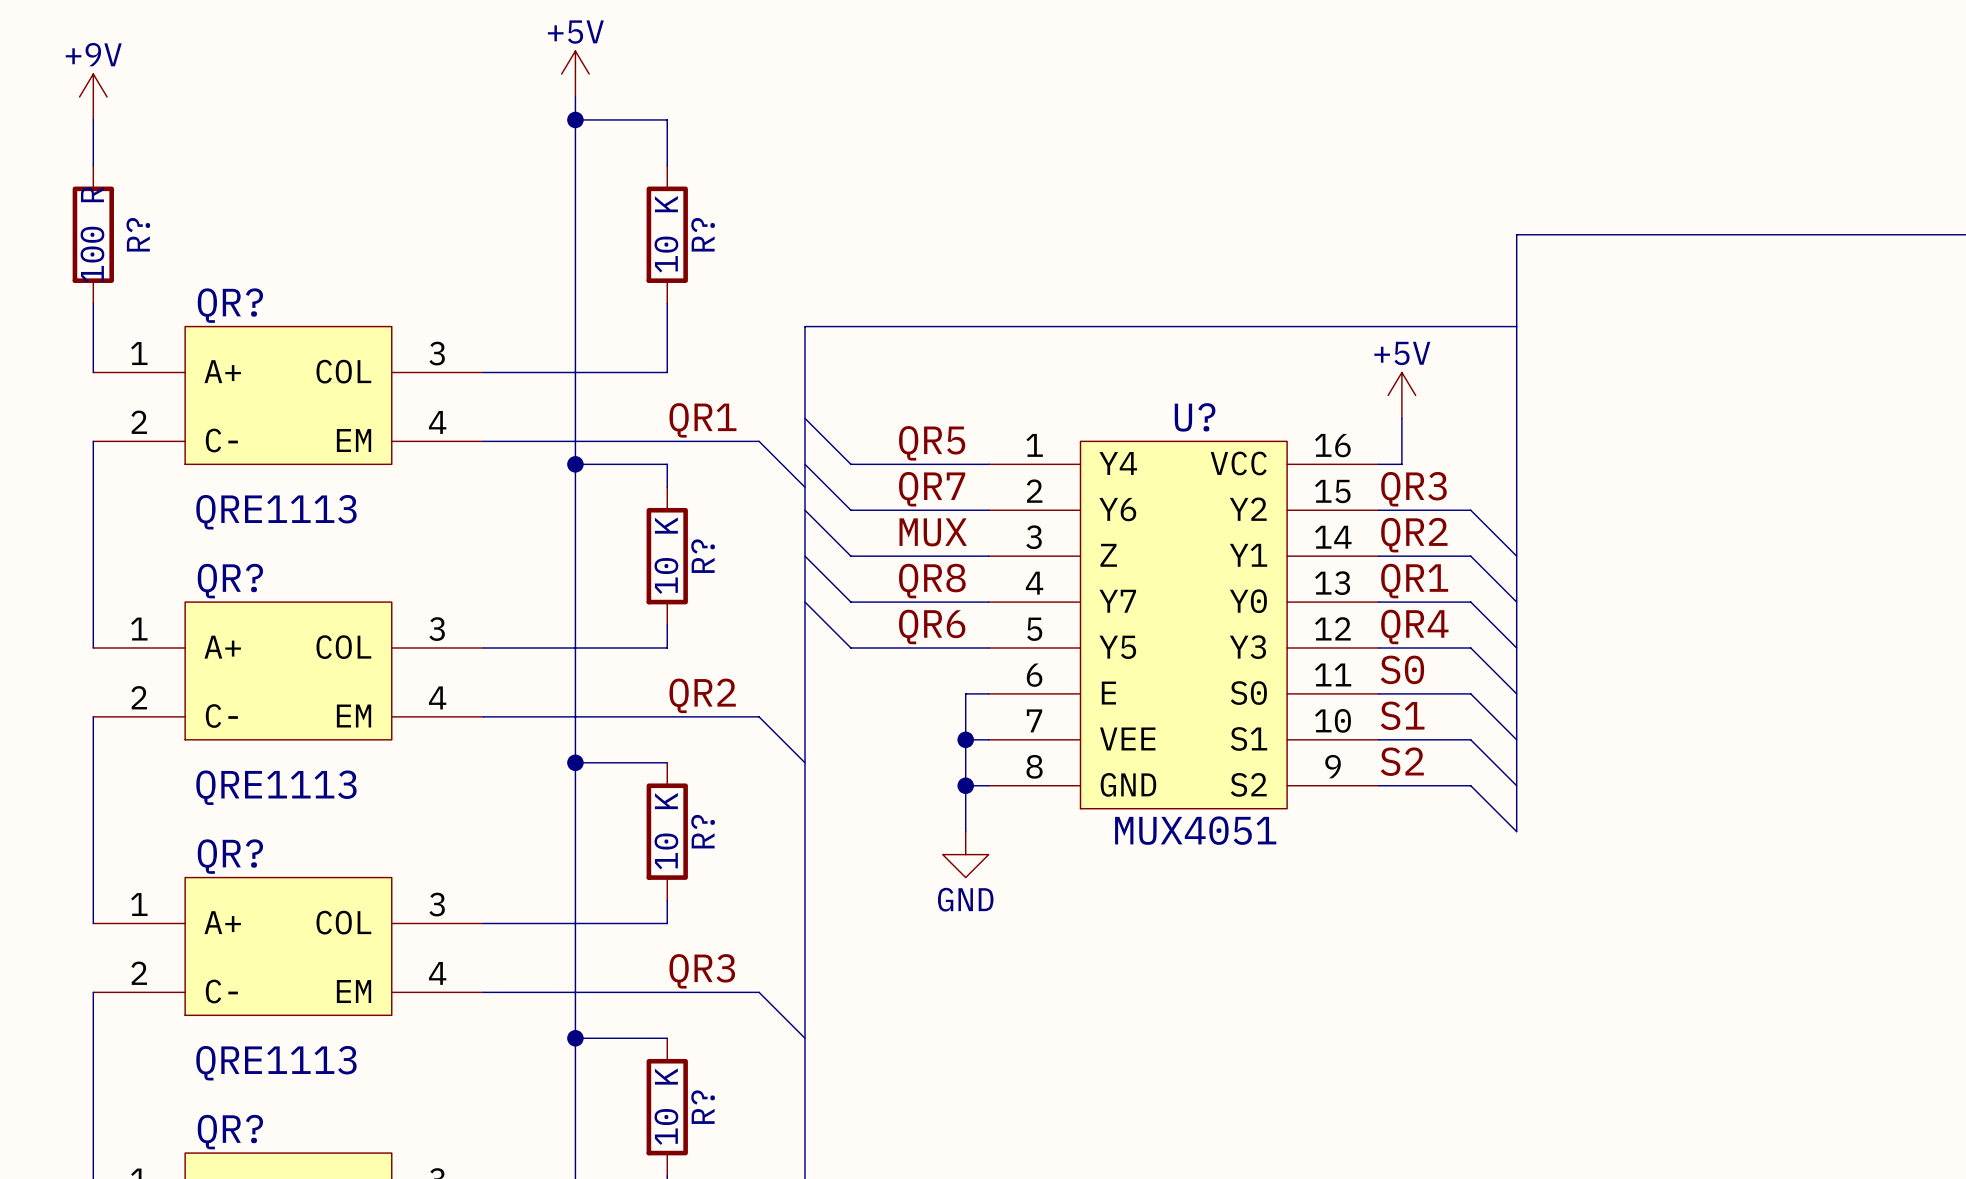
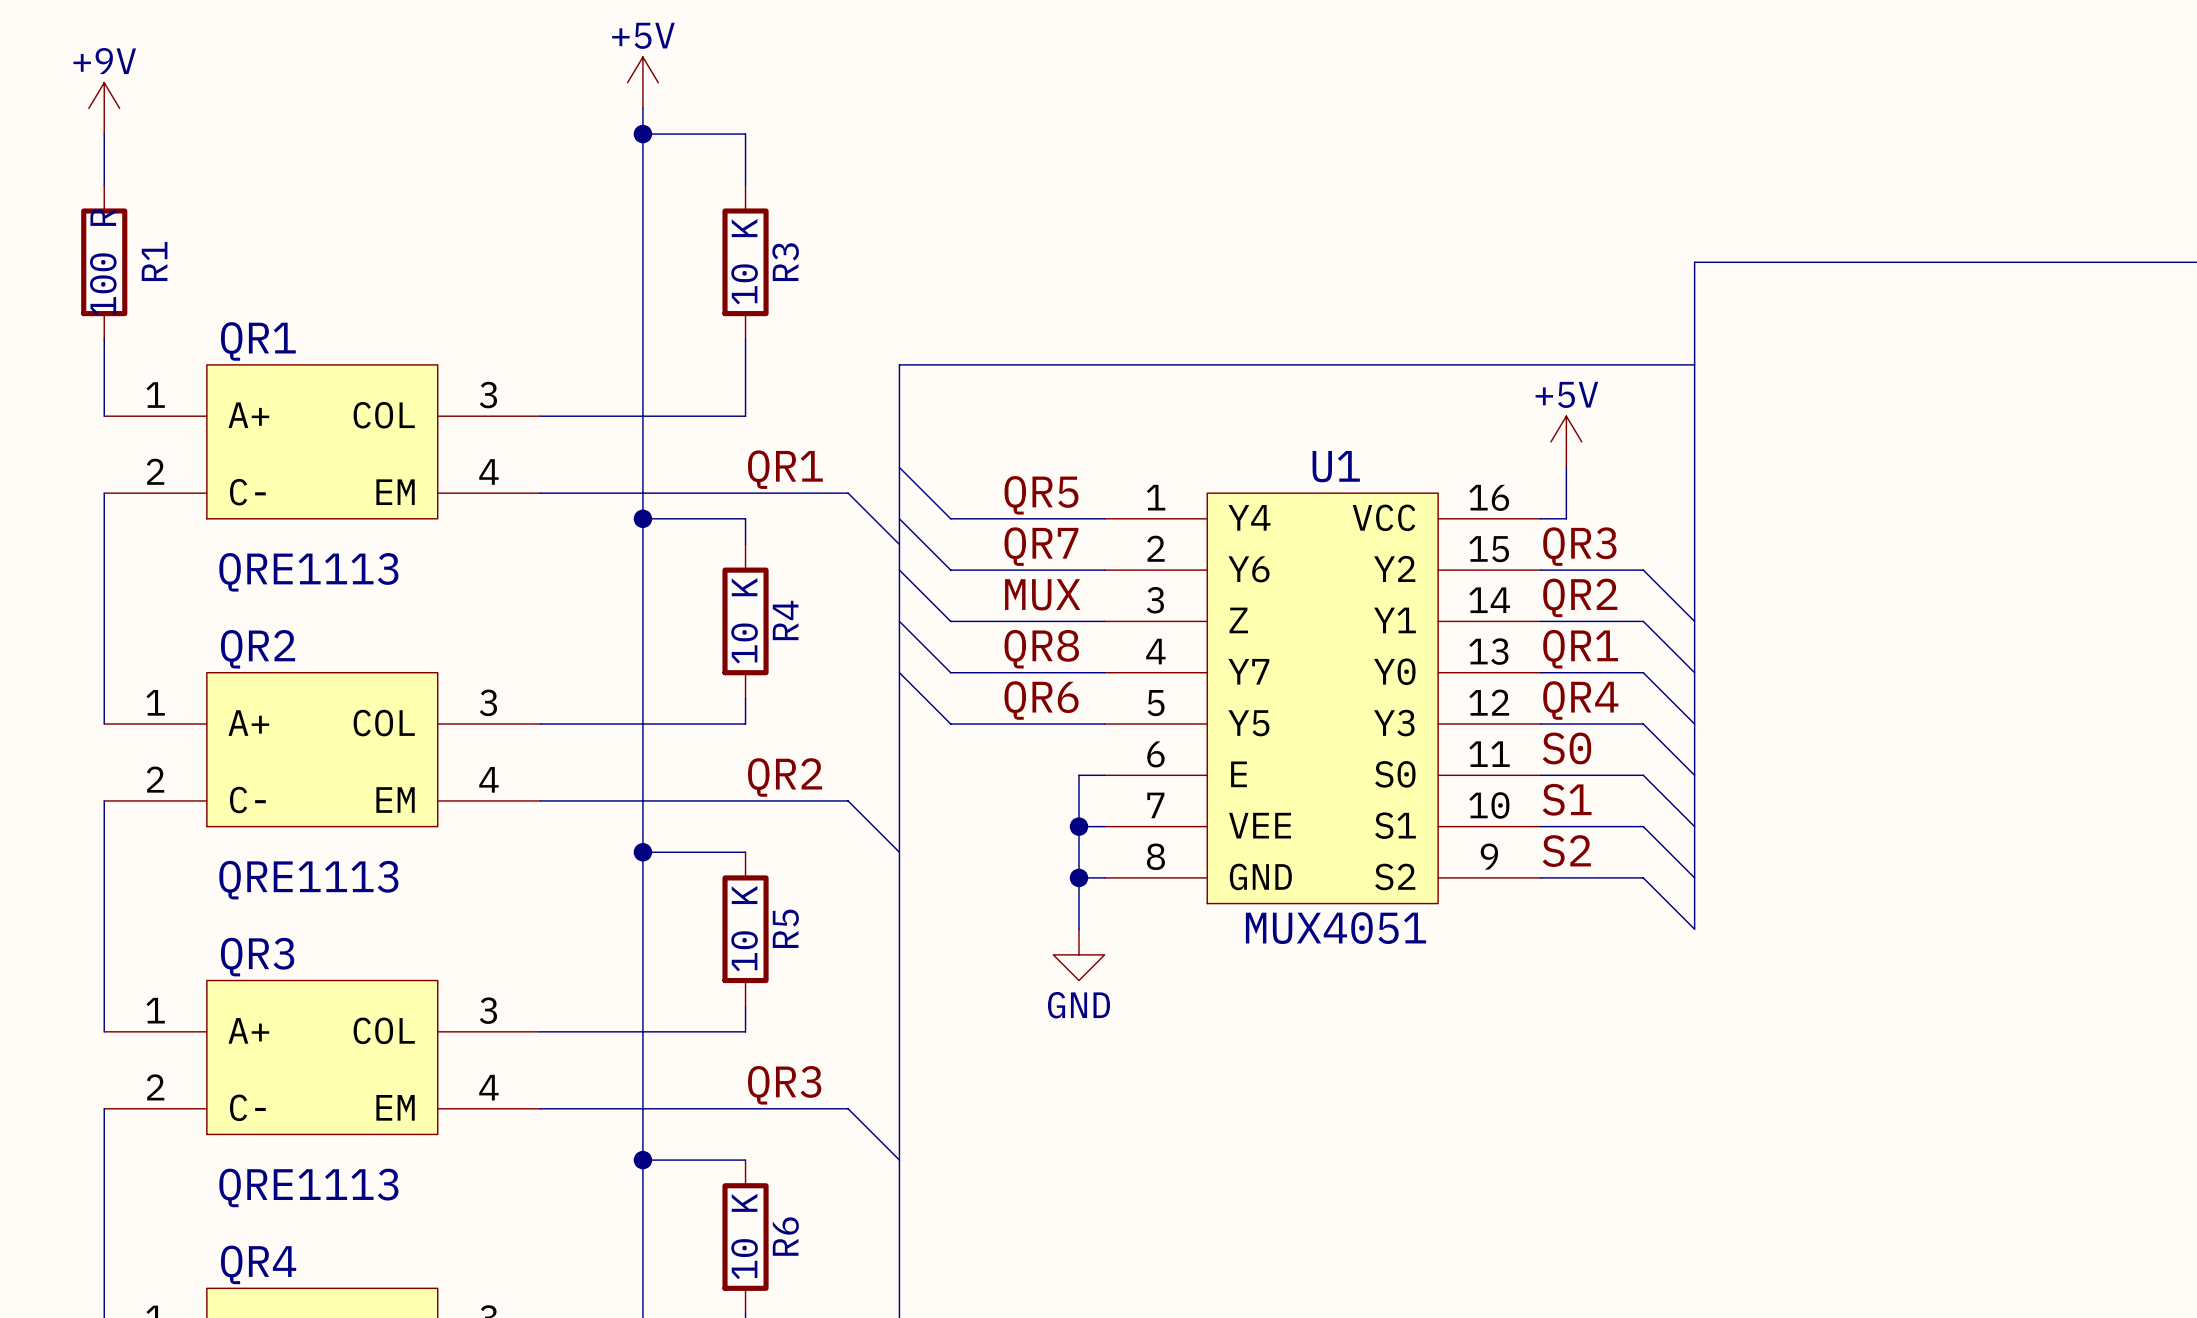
R? name: R? (138, 234) -> R1 (154, 261)
R? name: R? (703, 234) -> R3 (785, 262)
QR? name: QR? (230, 305) -> QR1 (258, 341)
U? name: U? (1195, 417) -> U1 (1336, 466)
R? name: R? (703, 556) -> R4 (785, 620)
QR? name: QR? (230, 581) -> QR2 (258, 649)
R? name: R? (703, 831) -> R5 (785, 928)
QR? name: QR? (230, 856) -> QR3 (257, 957)
R? name: R? (703, 1107) -> R6 (785, 1236)
QR? name: QR? (230, 1132) -> QR4 (258, 1264)

